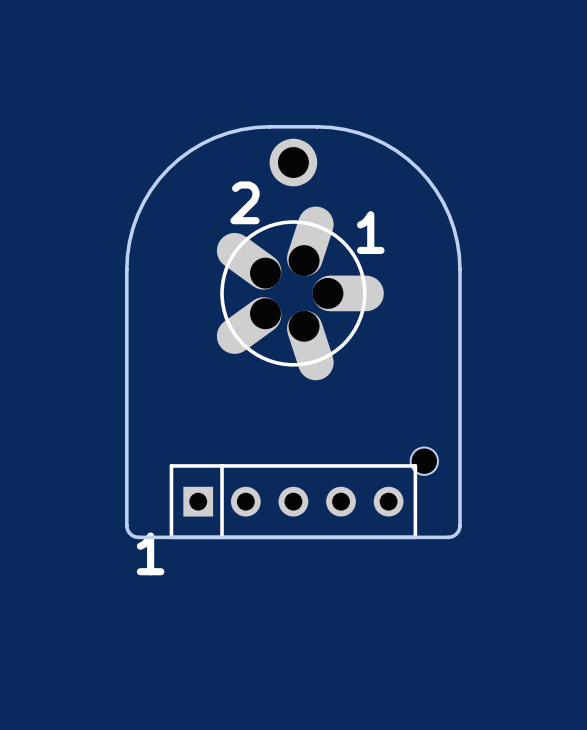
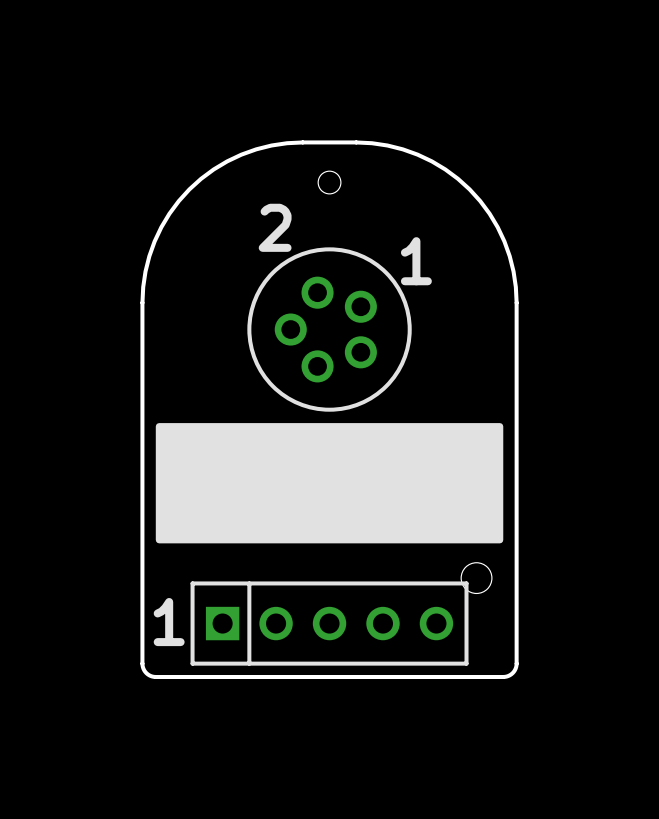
part footprint: [216, 138, 384, 381] -> [247, 171, 412, 412]
drawing: none -> [155, 423, 504, 544]
part position: (303, 493) -> (341, 614)
board edge: (126, 525) (130, 533) (138, 537) (448, 537) (456, 533) (460, 525) -> (142, 590) (142, 665) (147, 674) (155, 677) (506, 676) (512, 673) (516, 665) (516, 590)

